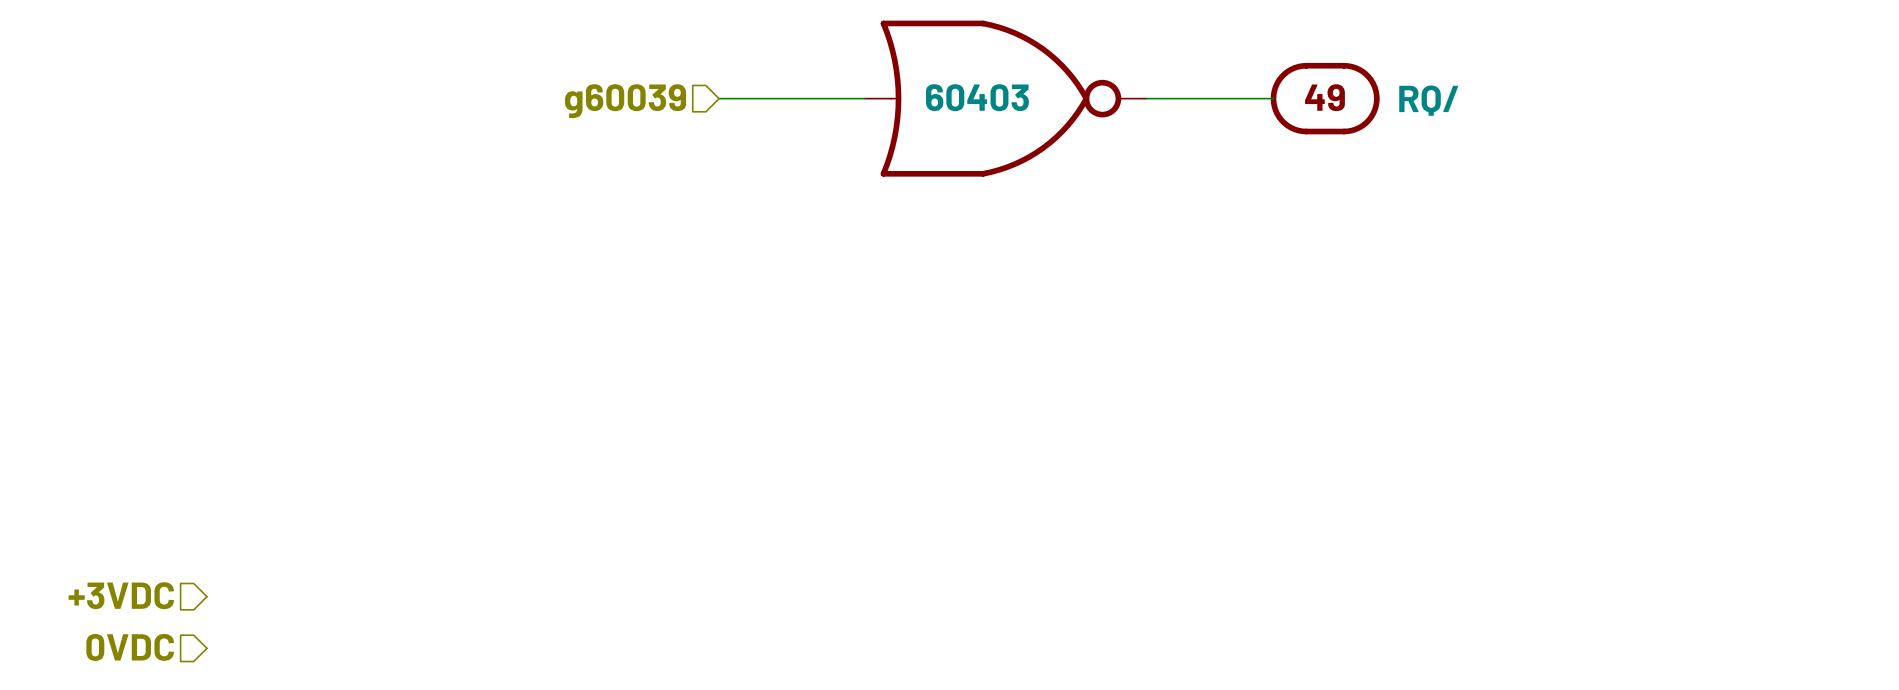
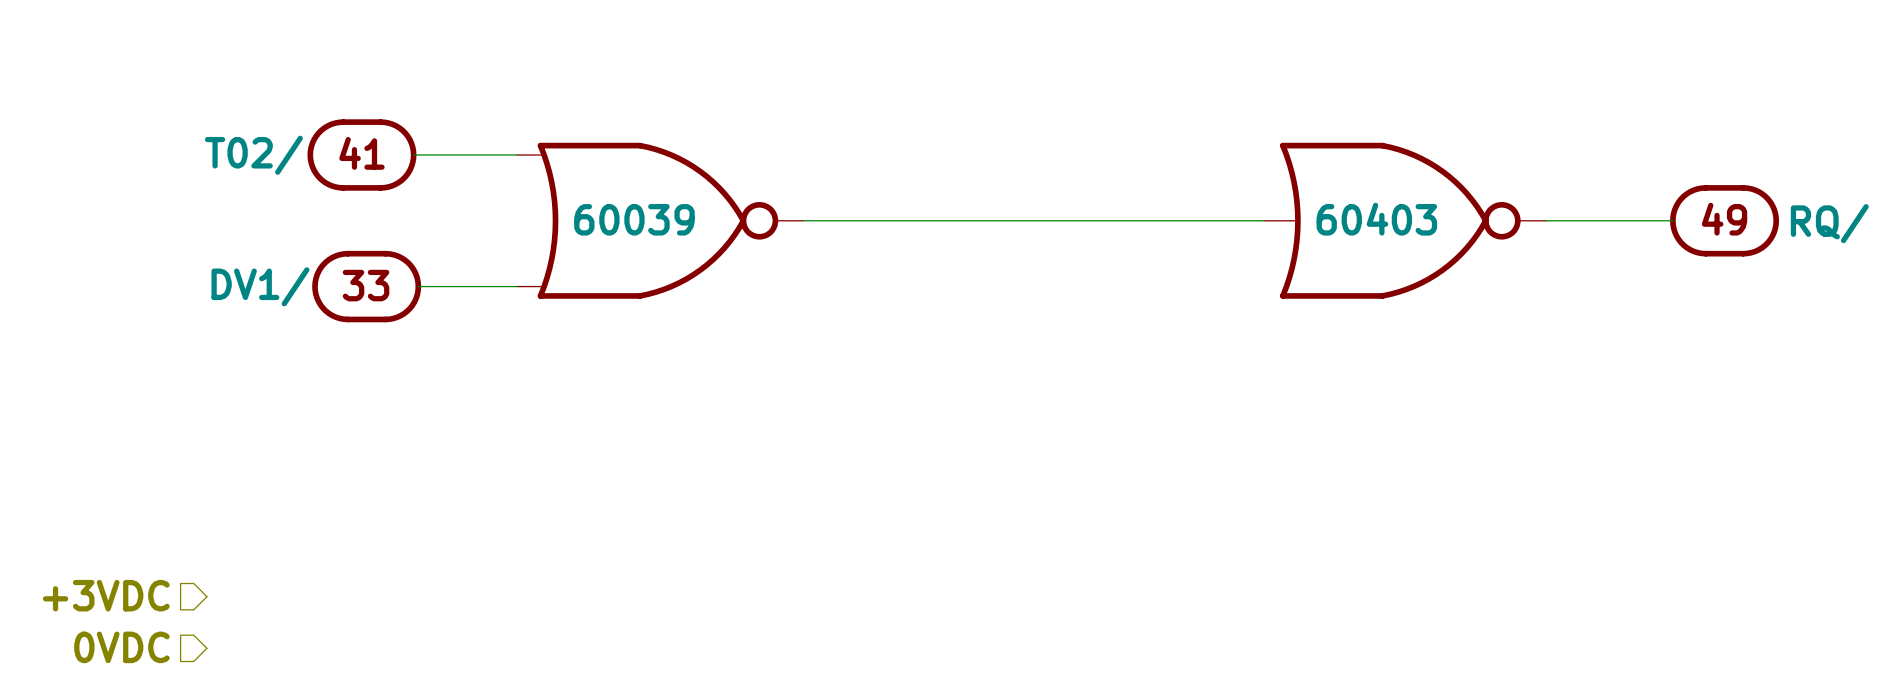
wire: (719, 98) (864, 98) -> none
part: (1005, 98) -> none
wire: (1146, 98) (1273, 98) -> none
part: (1325, 98) -> none
hierarchical label: g60039 (625, 101) -> none
part: none -> (361, 155)
wire: none -> (413, 155) (517, 155)
part: none -> (660, 220)
wire: none -> (803, 220) (1264, 220)
part: none -> (1405, 220)
wire: none -> (1545, 220) (1672, 220)
part: none -> (1724, 220)
part: none -> (366, 286)
wire: none -> (418, 286) (517, 286)

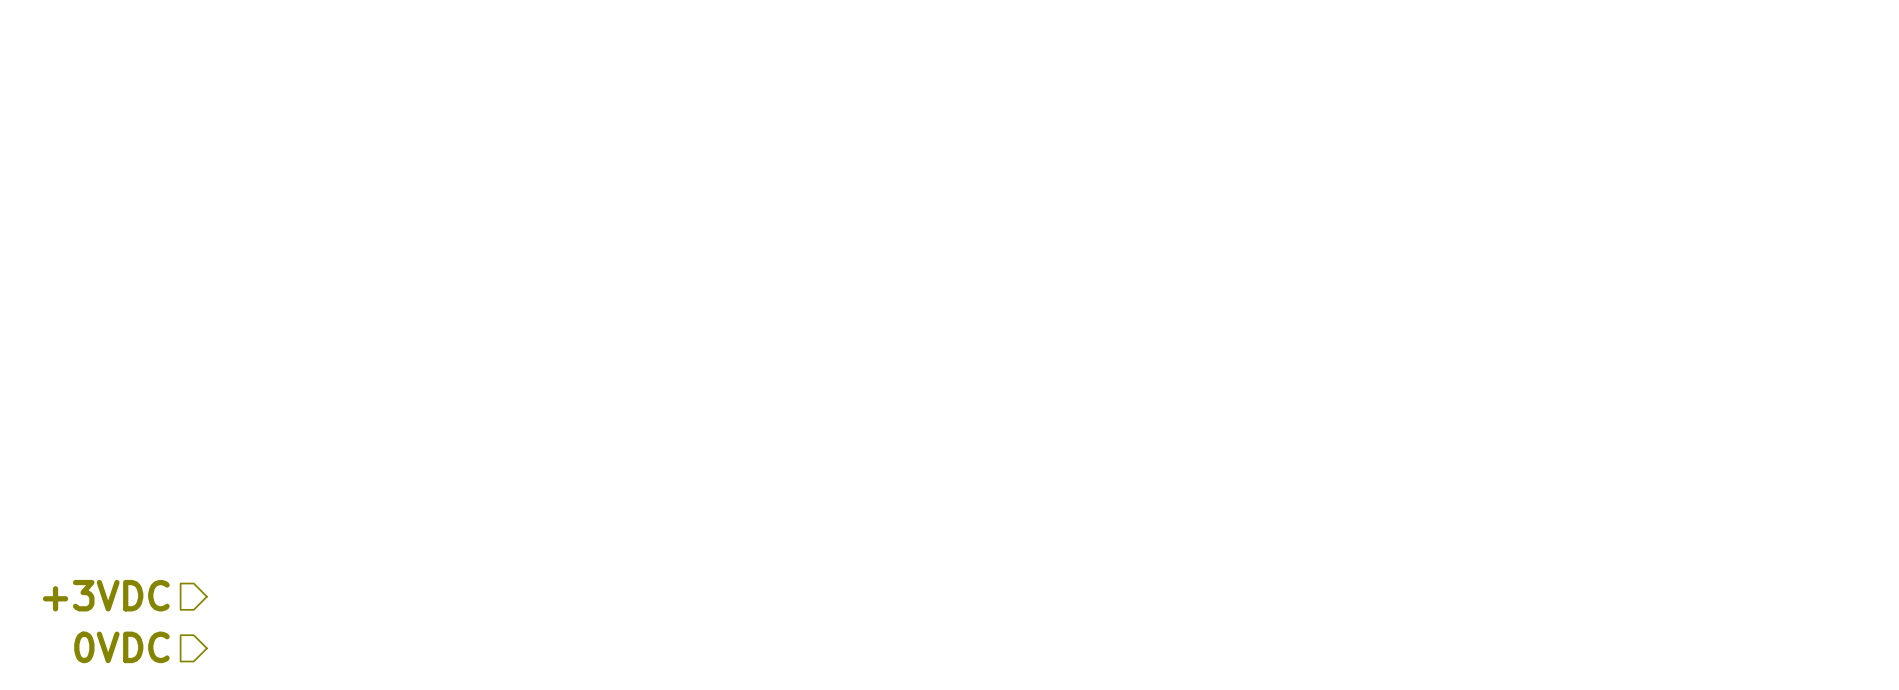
part: (361, 155) -> none
wire: (413, 155) (517, 155) -> none
part: (660, 220) -> none
wire: (803, 220) (1264, 220) -> none
part: (1405, 220) -> none
wire: (1545, 220) (1672, 220) -> none
part: (1724, 220) -> none
part: (366, 286) -> none
wire: (418, 286) (517, 286) -> none

